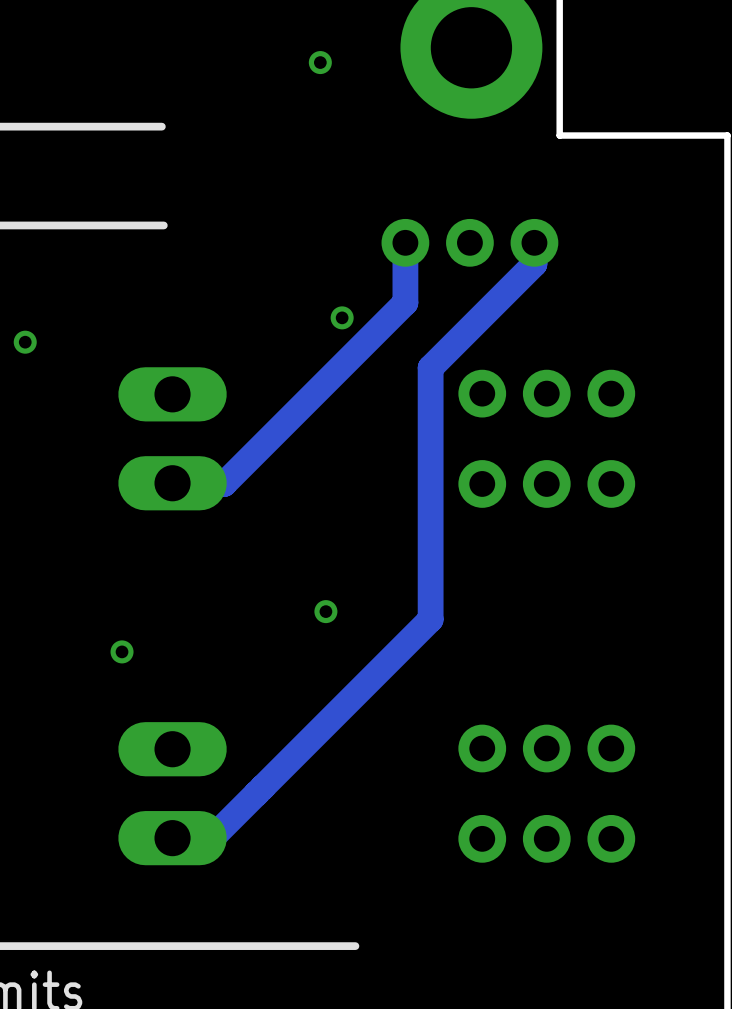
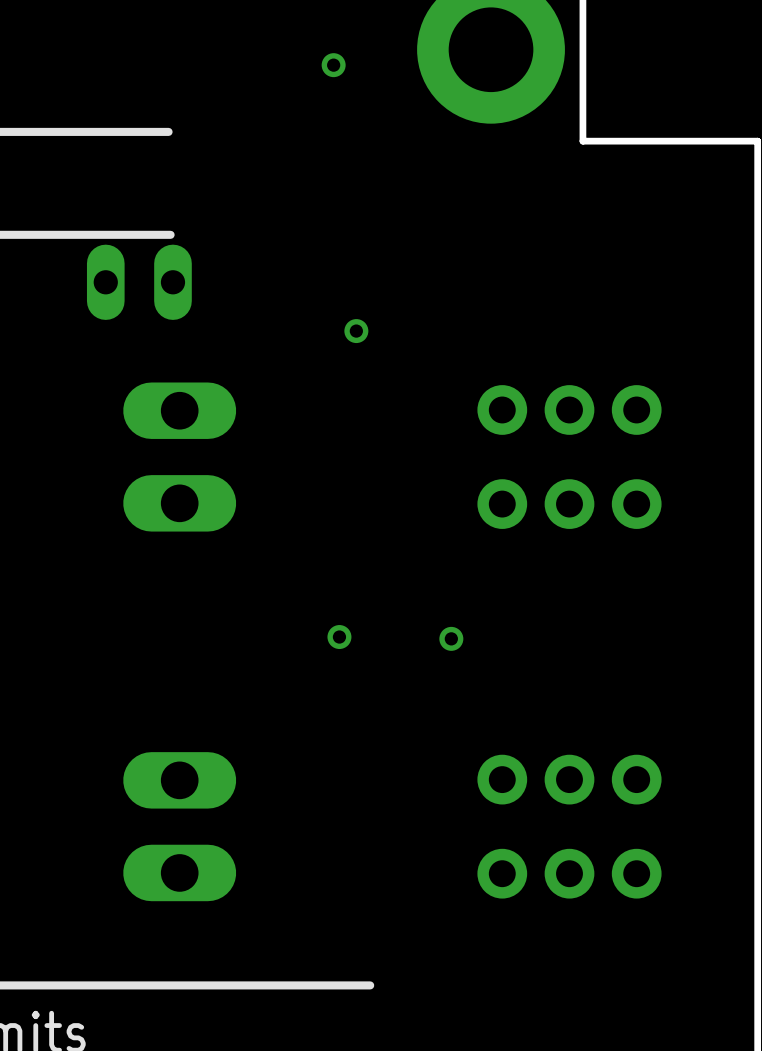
track: (405, 242) (405, 302) (224, 483) (172, 483) -> none
part: (469, 242) -> none
track: (534, 242) (534, 264) (430, 367) (430, 619) (211, 838) (146, 838) -> none
part: none -> (139, 282)
via: (25, 342) -> none
via: none -> (451, 638)
via: (122, 651) -> none

